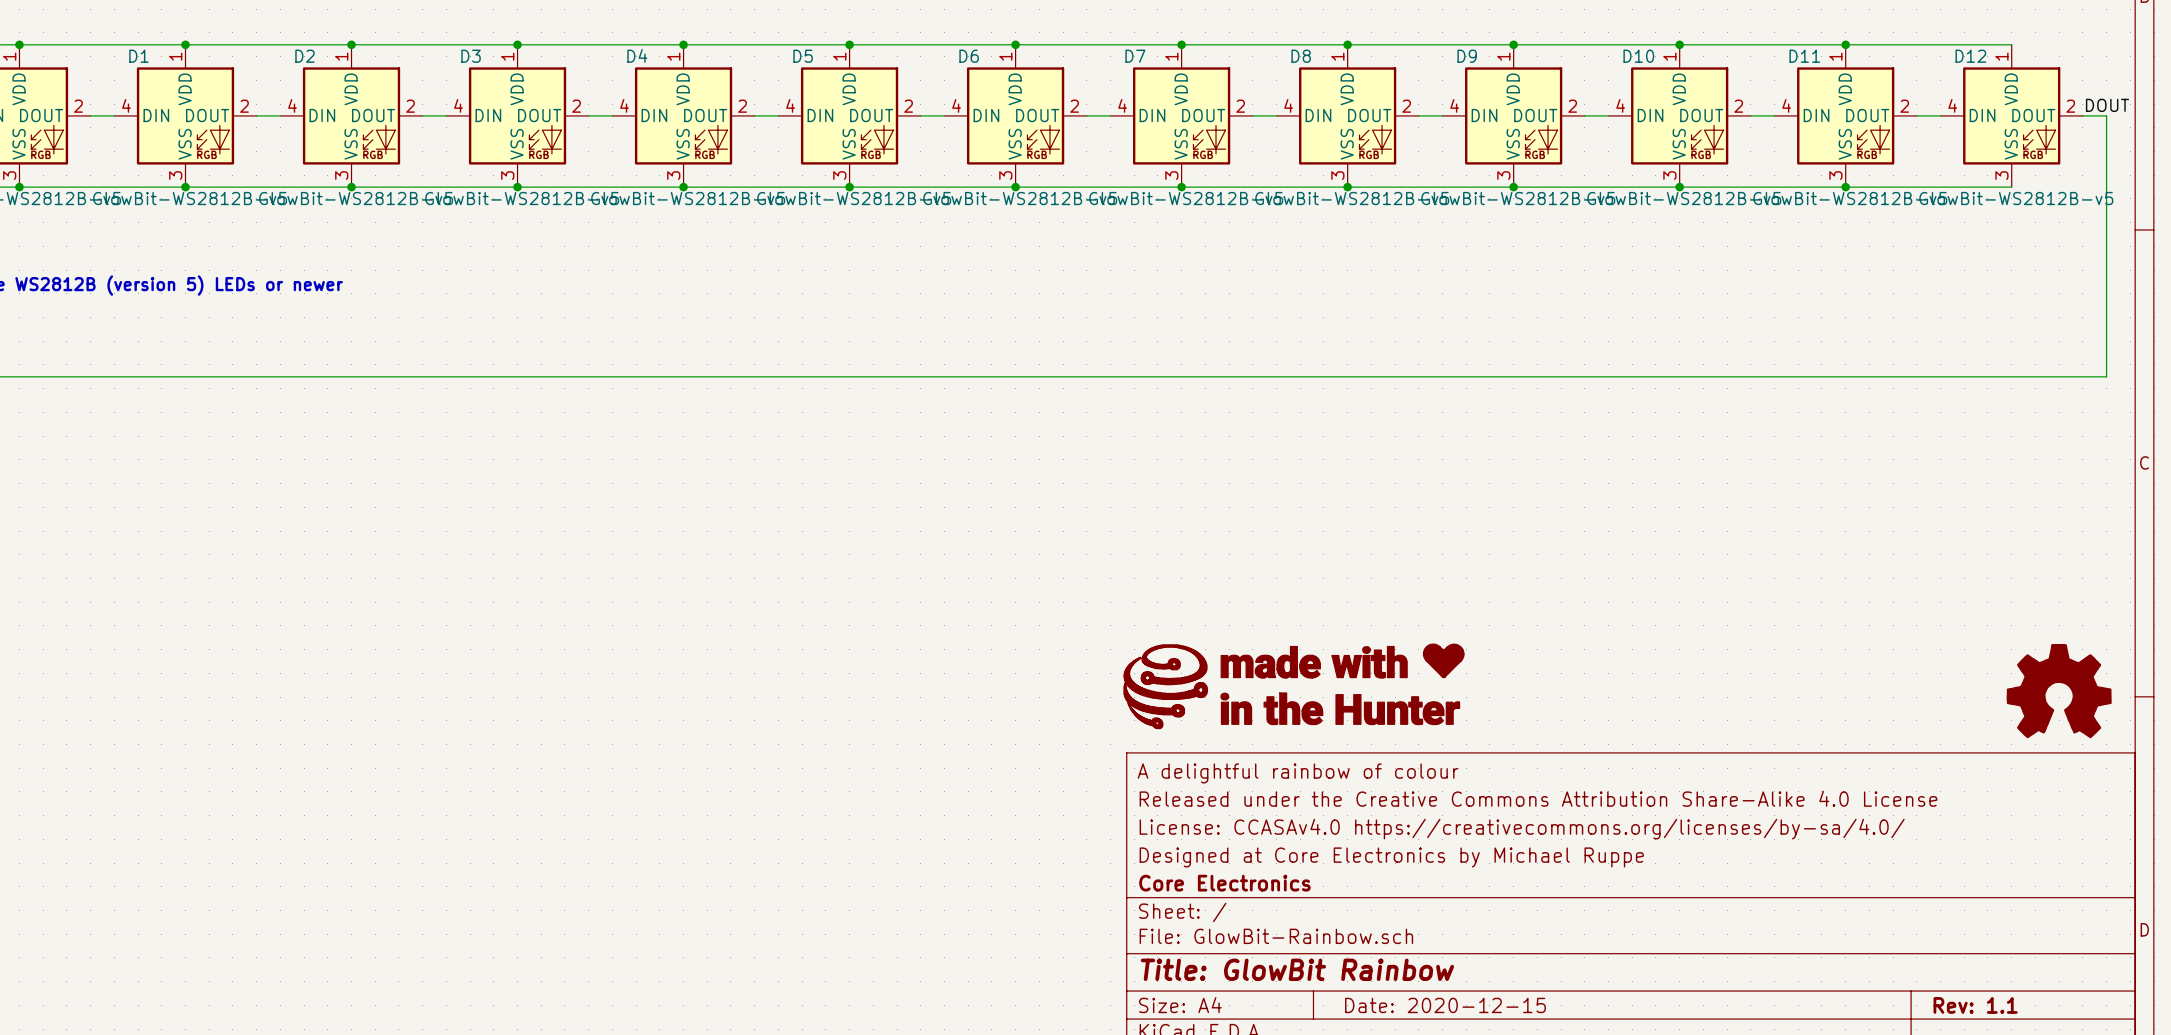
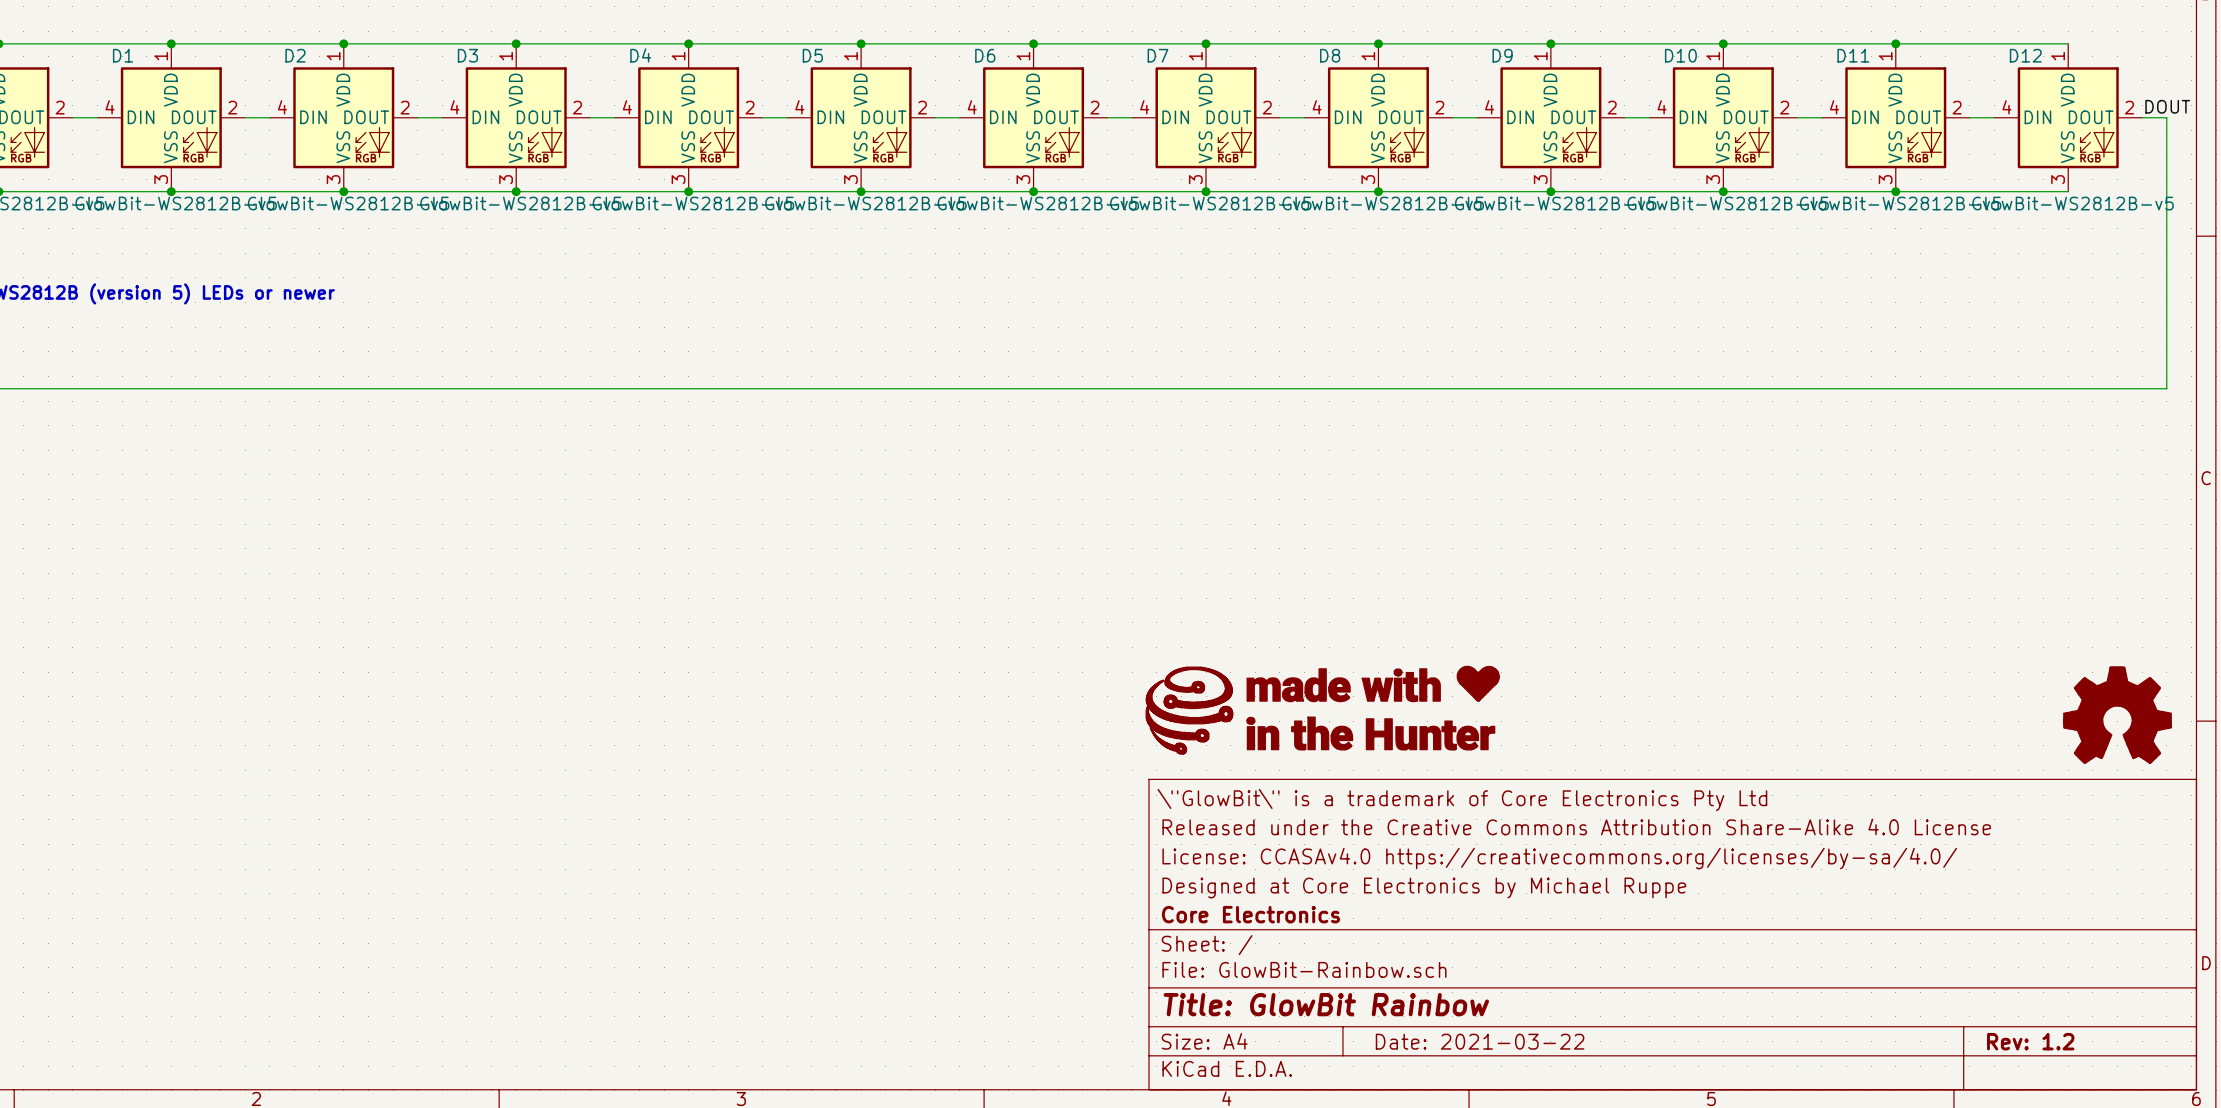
title block: A delightful rainbow of colour (1298, 773) -> \"GlowBit\" is a trademark of Core Electronics Pty Ltd (1462, 799)
title block: Date: 2020-12-15 (1445, 1005) -> Date: 2021-03-22 (1480, 1041)
title block: Rev: 1.1 (1975, 1005) -> Rev: 1.2 (2030, 1041)

